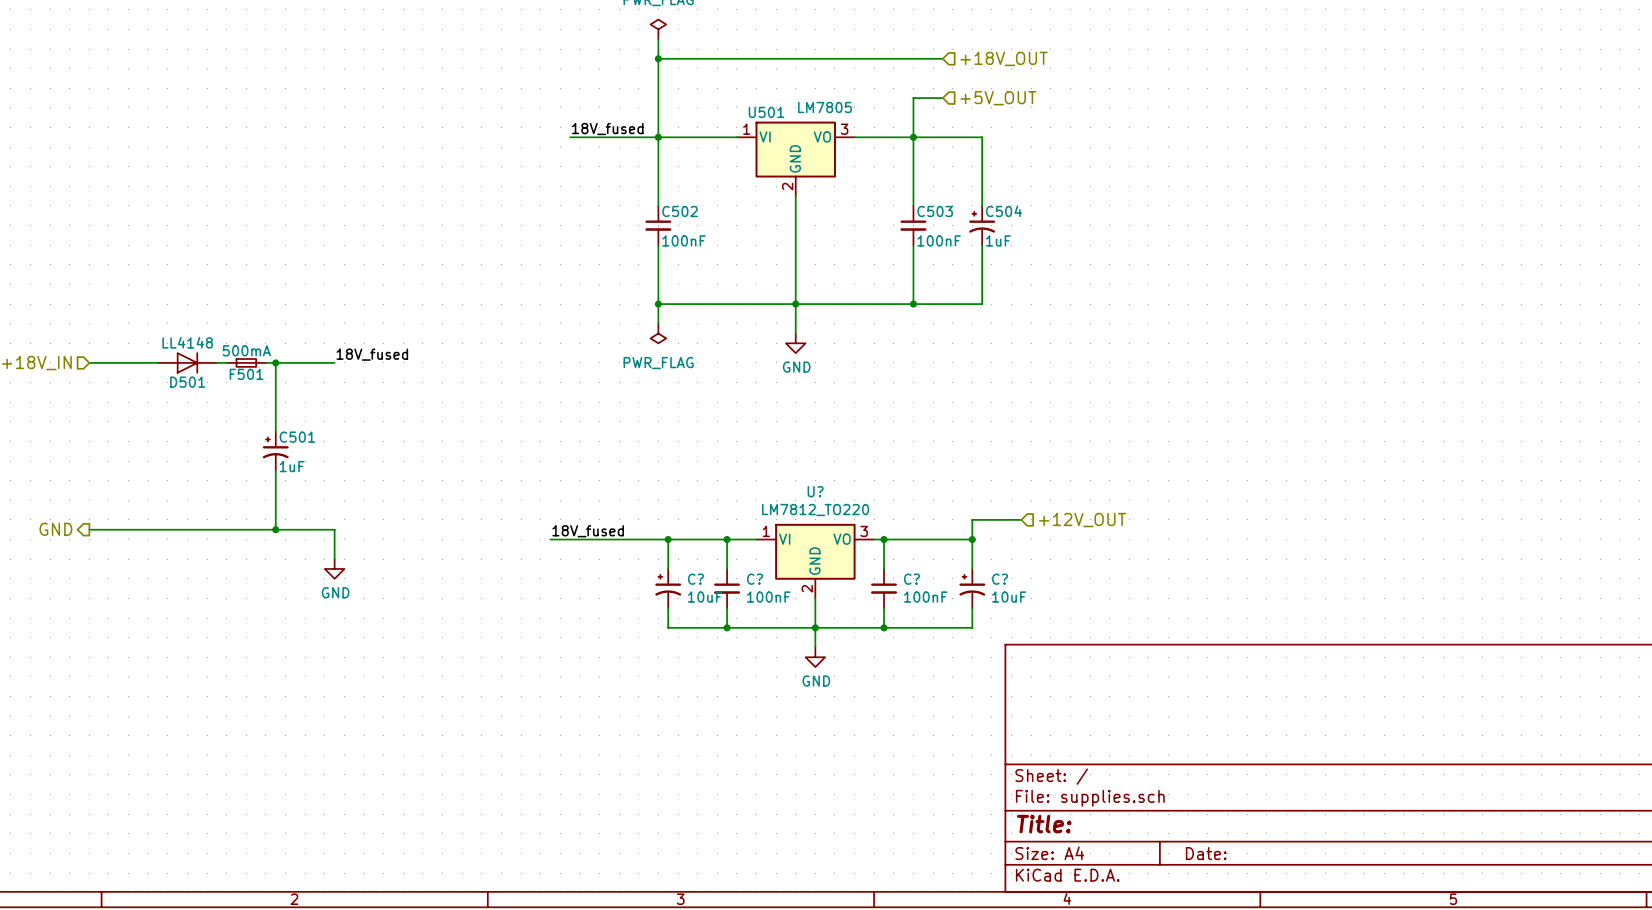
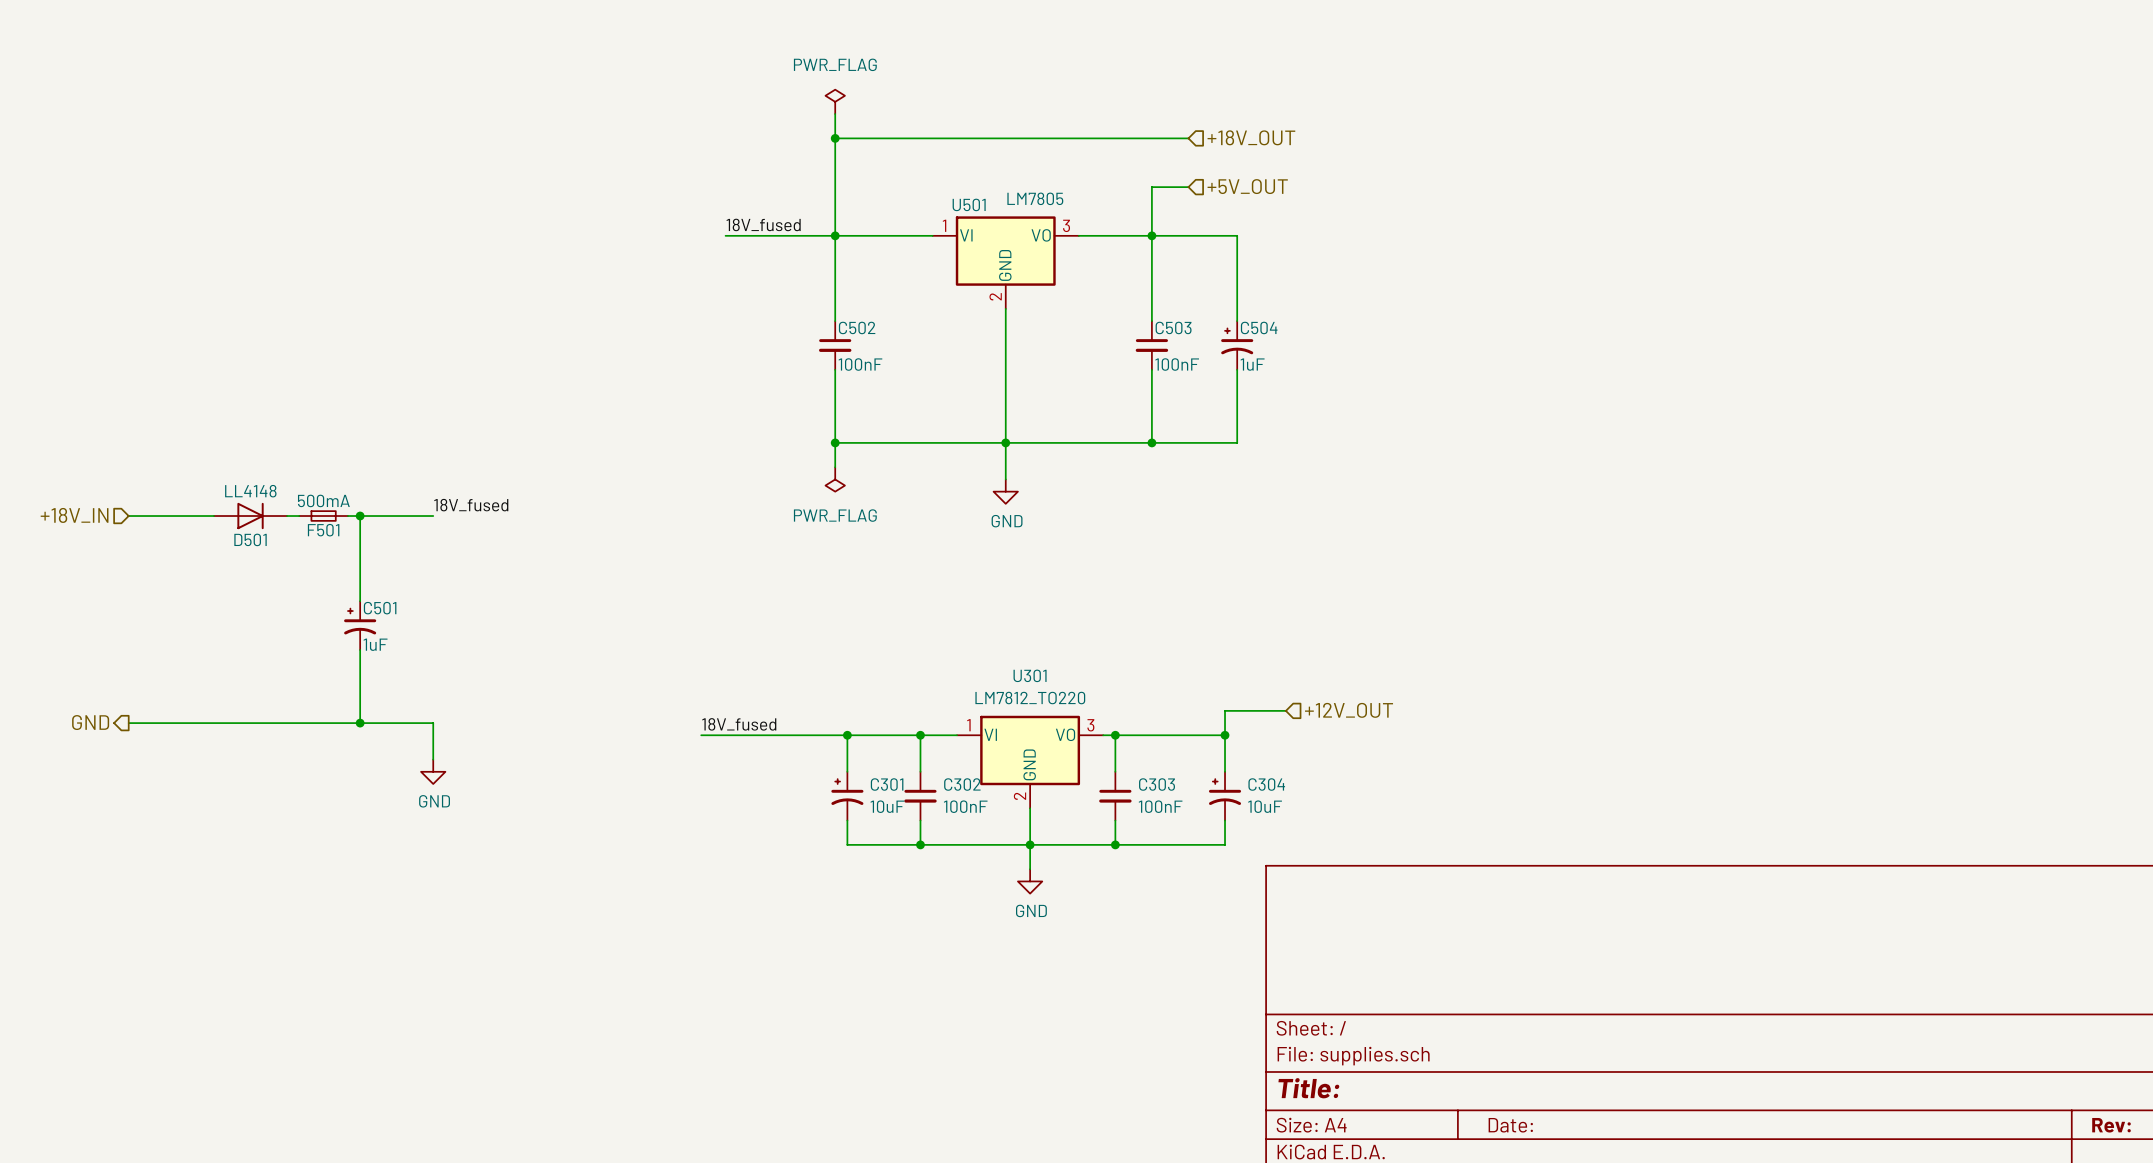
U? name: U? (815, 491) -> U301 (1030, 675)
C? name: C? (695, 579) -> C301 (887, 784)
C? name: C? (754, 579) -> C302 (962, 784)
C? name: C? (911, 579) -> C303 (1157, 784)
C? name: C? (1000, 579) -> C304 (1266, 784)

